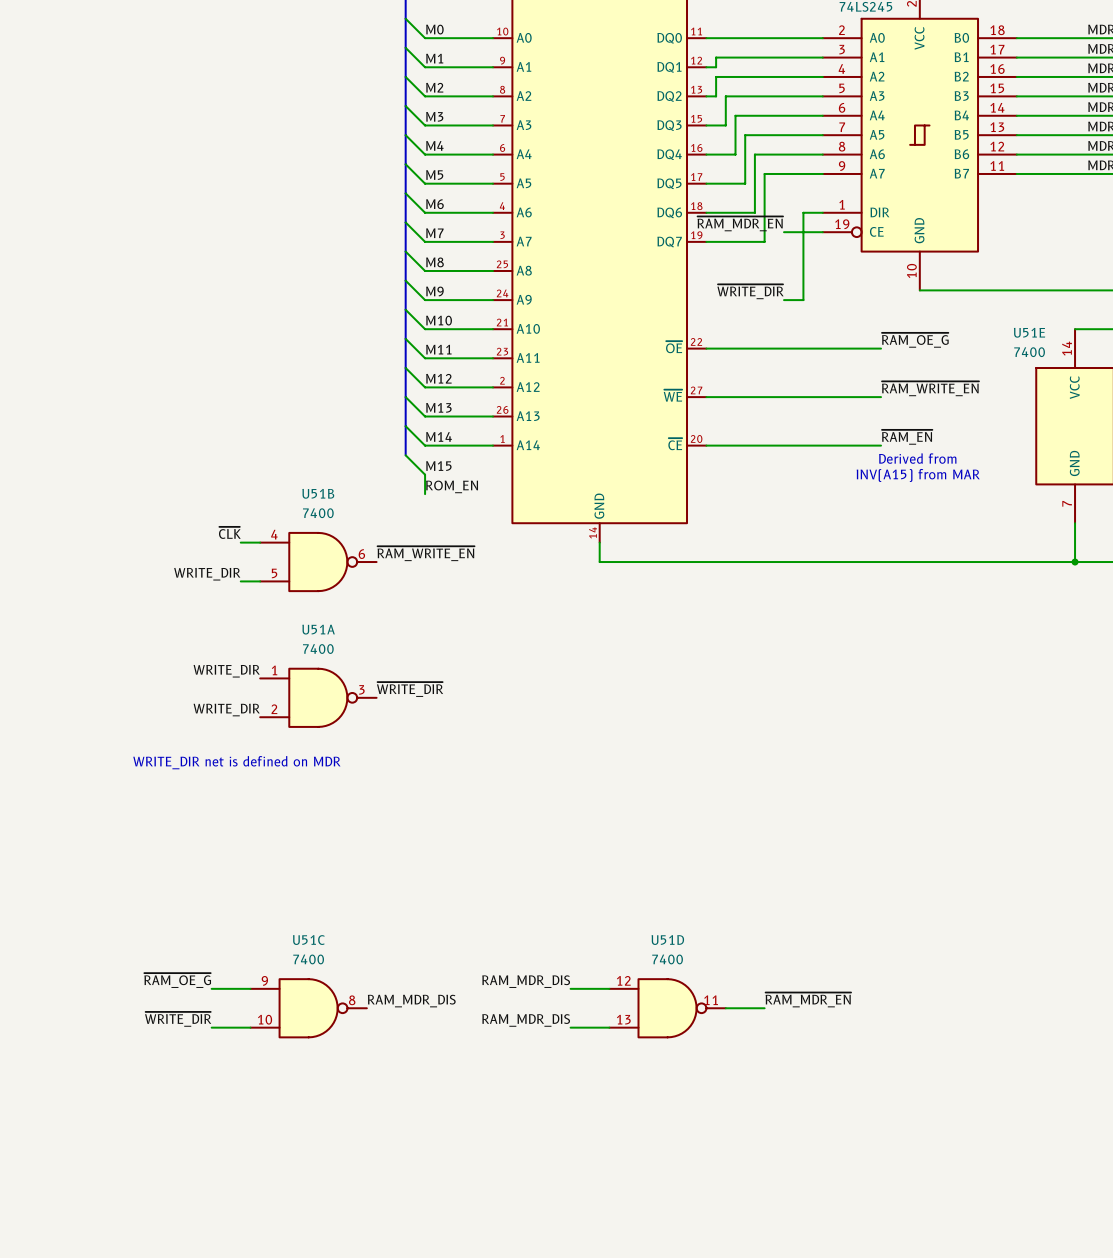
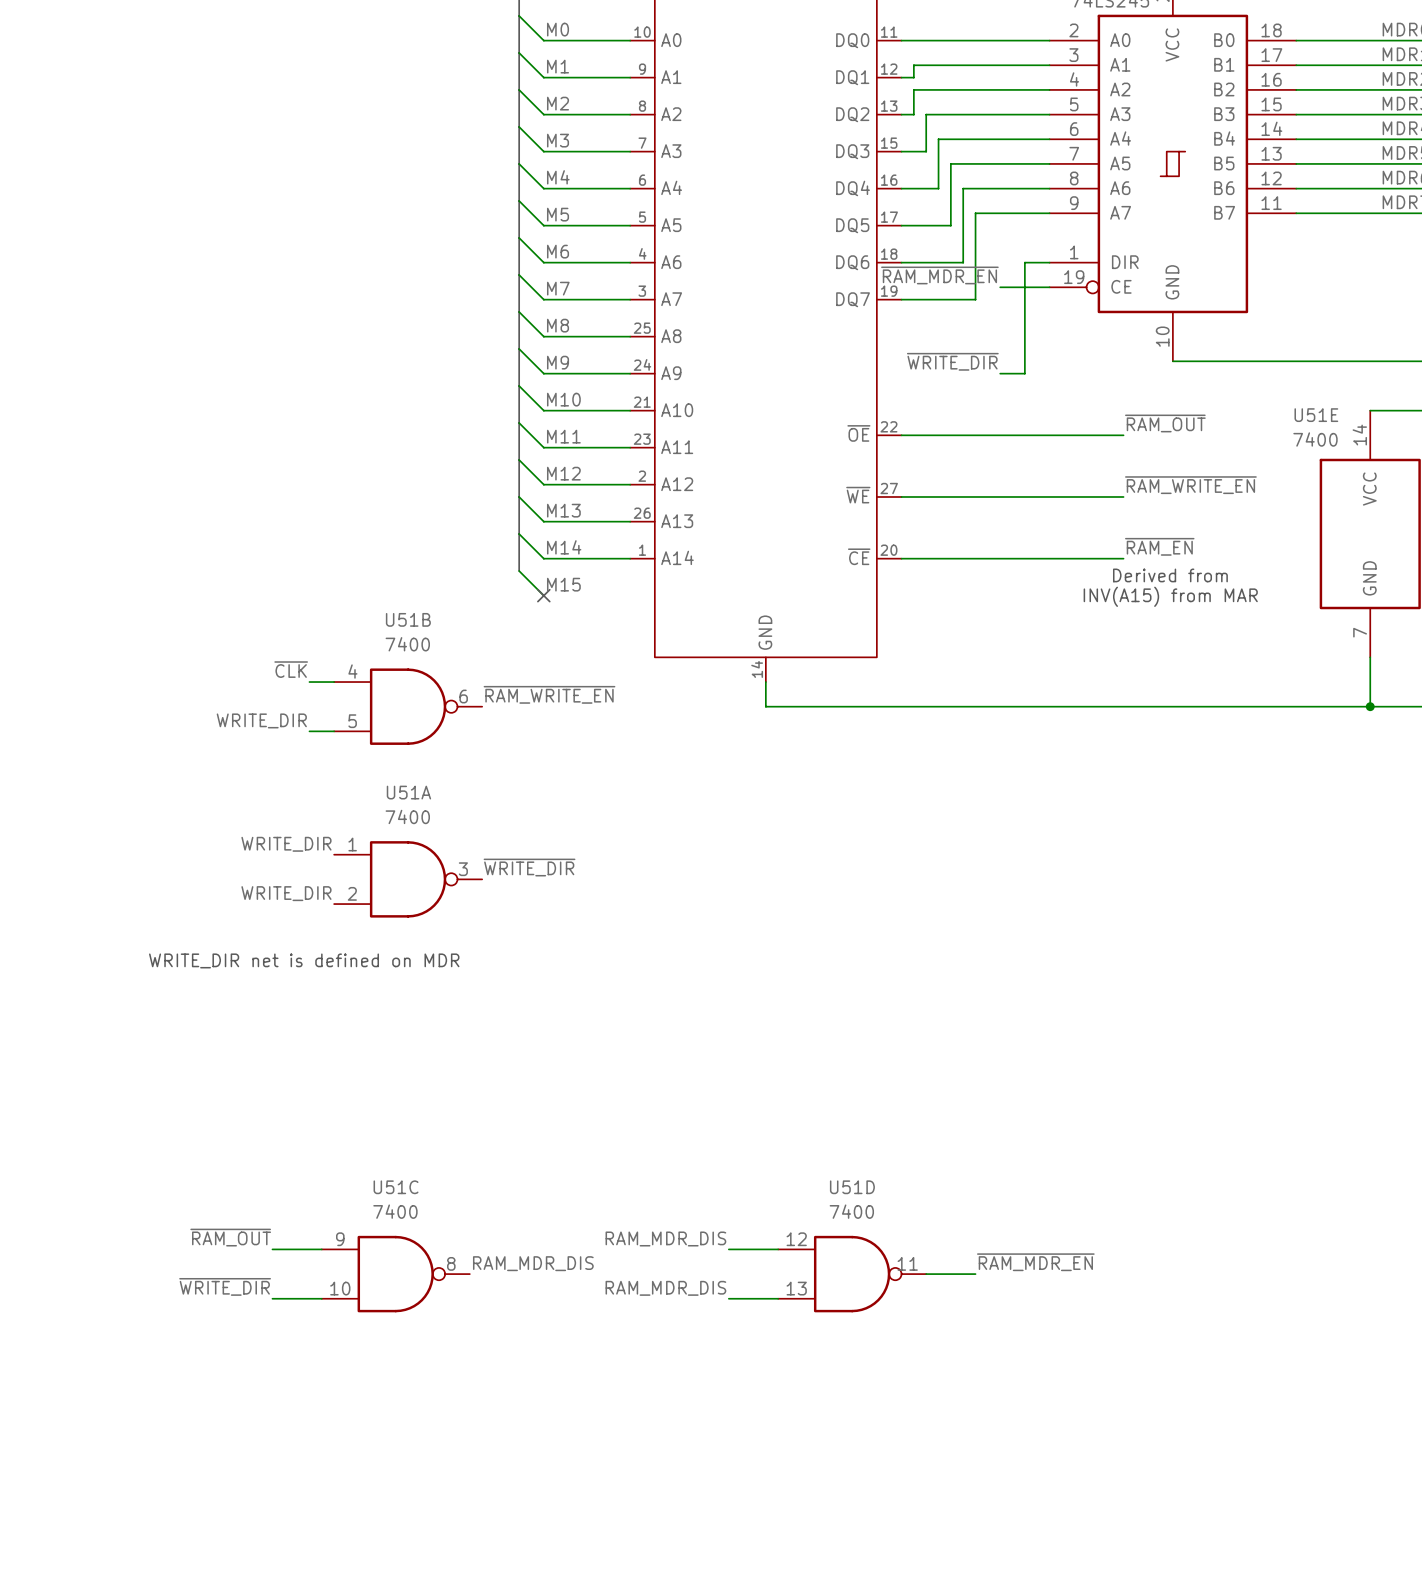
label: ~{RAM_OE_G} (915, 340) -> ~{RAM_OUT} (1165, 423)
wire: (425, 474) (425, 494) -> none
no-connect mark: none -> (543, 595)
label: ROM_EN (452, 486) -> none
label: ~{RAM_OE_G} (177, 980) -> ~{RAM_OUT} (230, 1237)

